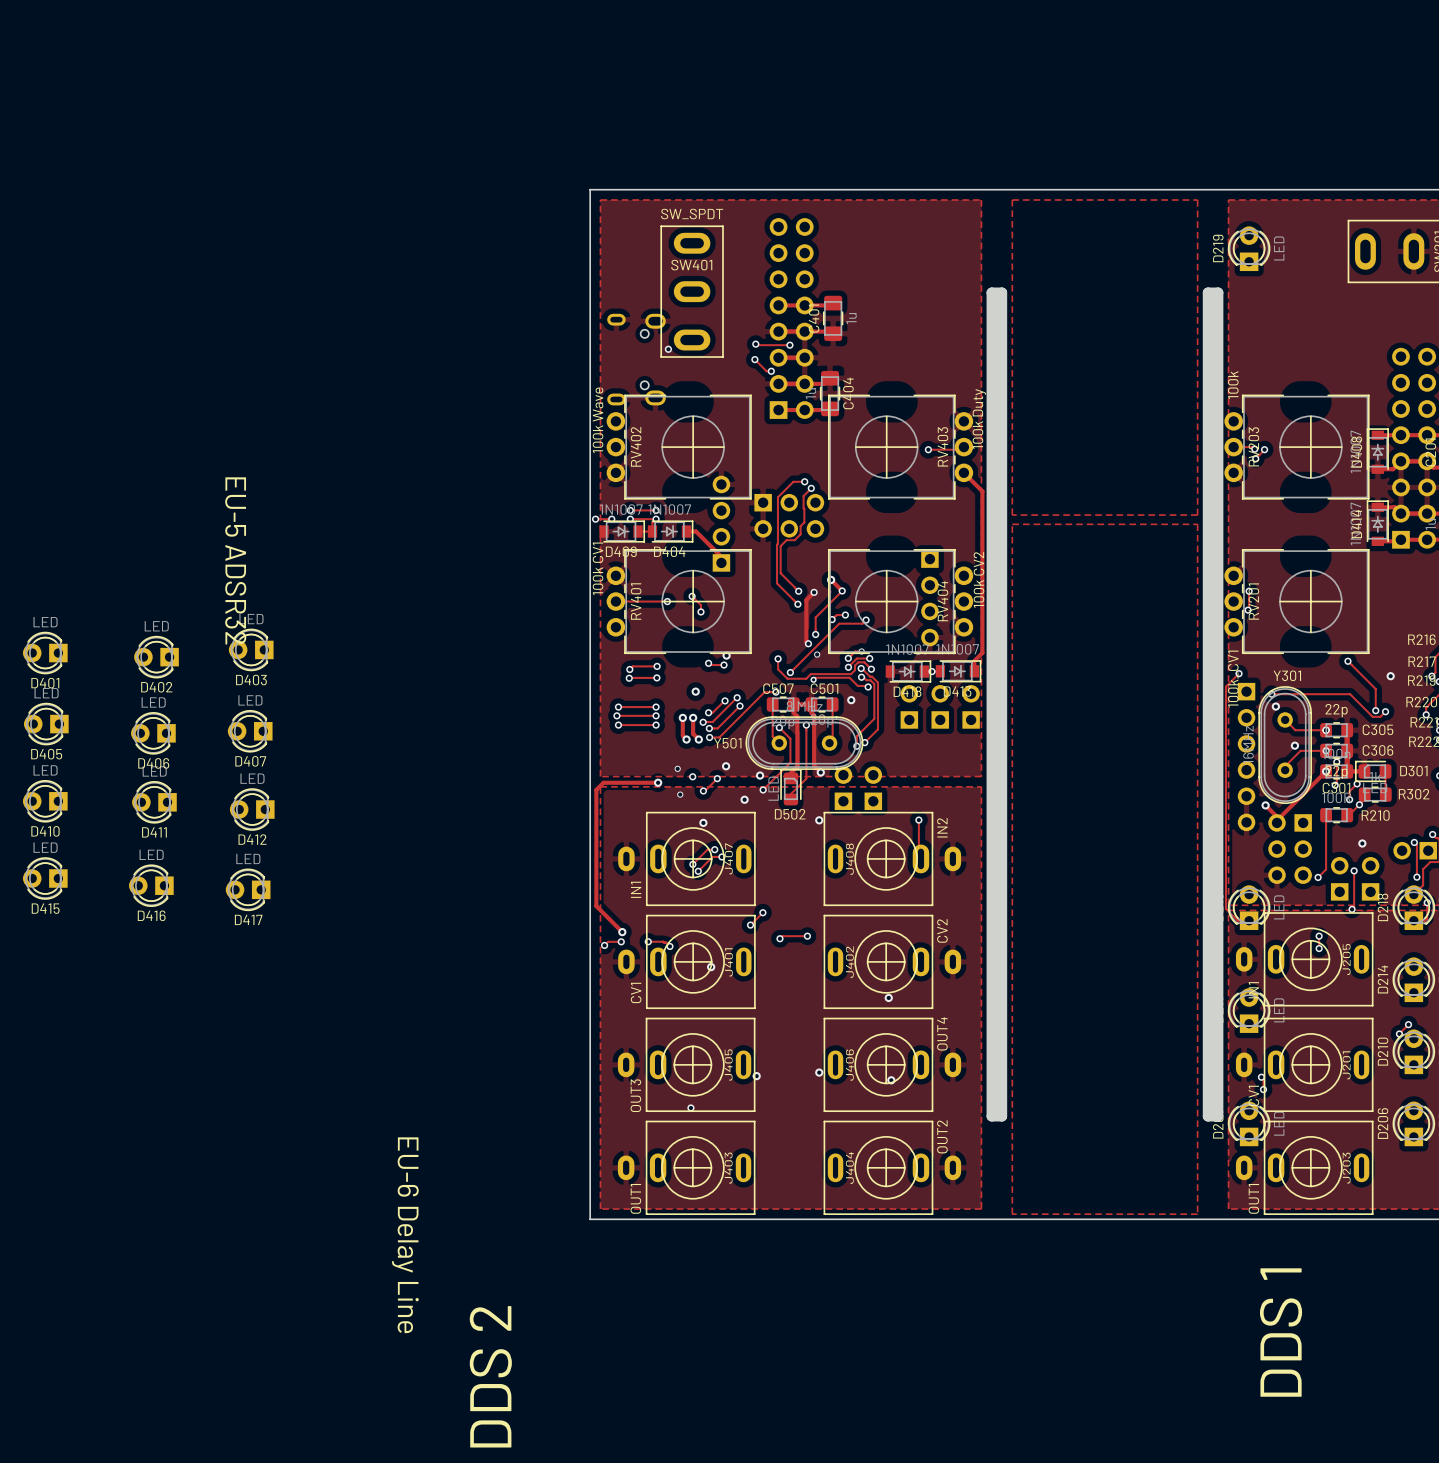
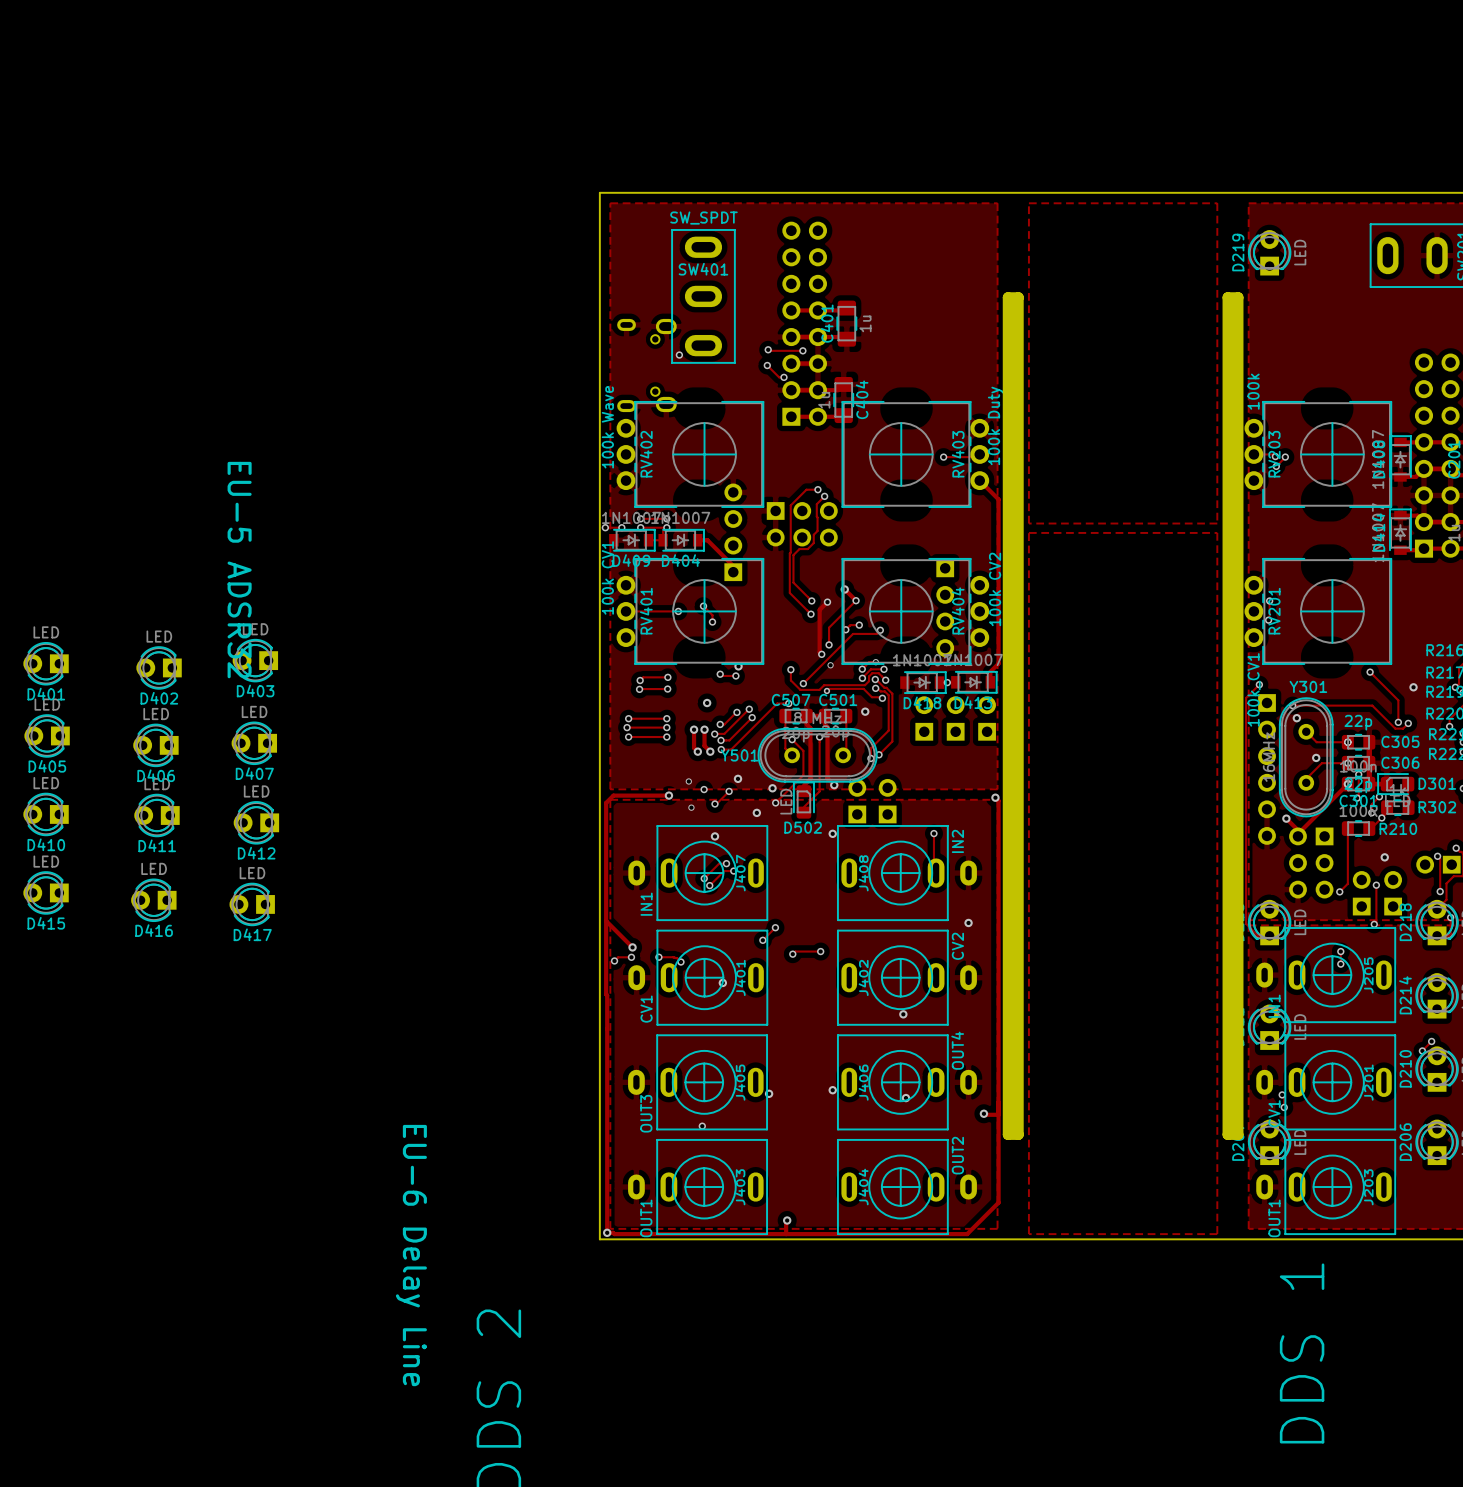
track: none -> (995, 797) (998, 800) (998, 1202) (967, 1234) (607, 1232) (606, 921)
via: none -> (995, 797)
via: none -> (968, 922)
track: none -> (983, 1113) (998, 1114)
via: none -> (983, 1113)
track: none -> (787, 1220) (786, 1234)
via: none -> (787, 1220)
via: none -> (607, 1232)

